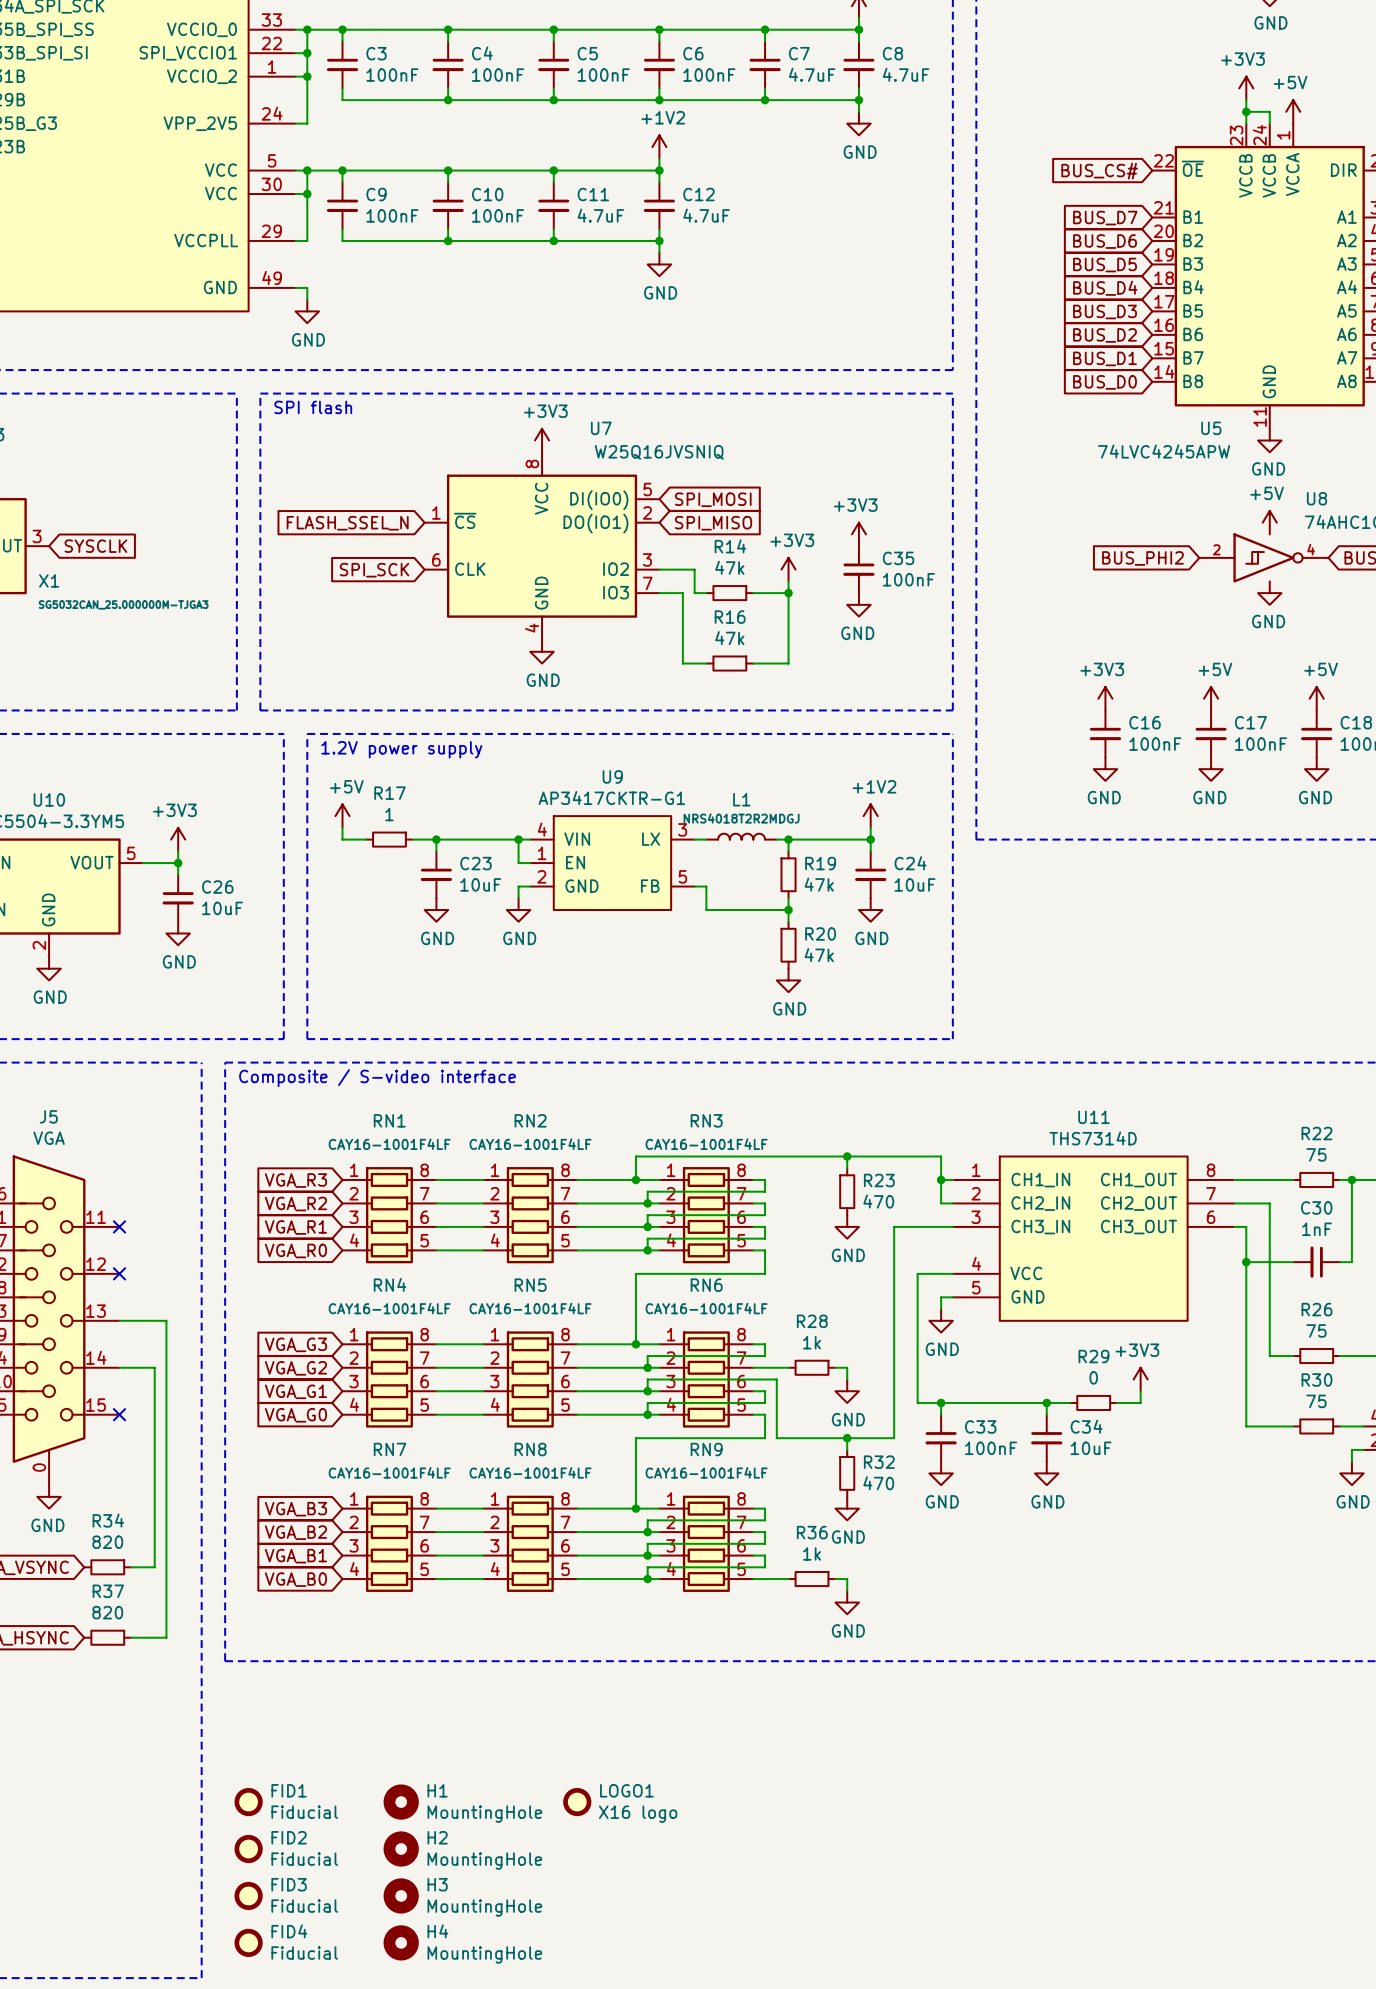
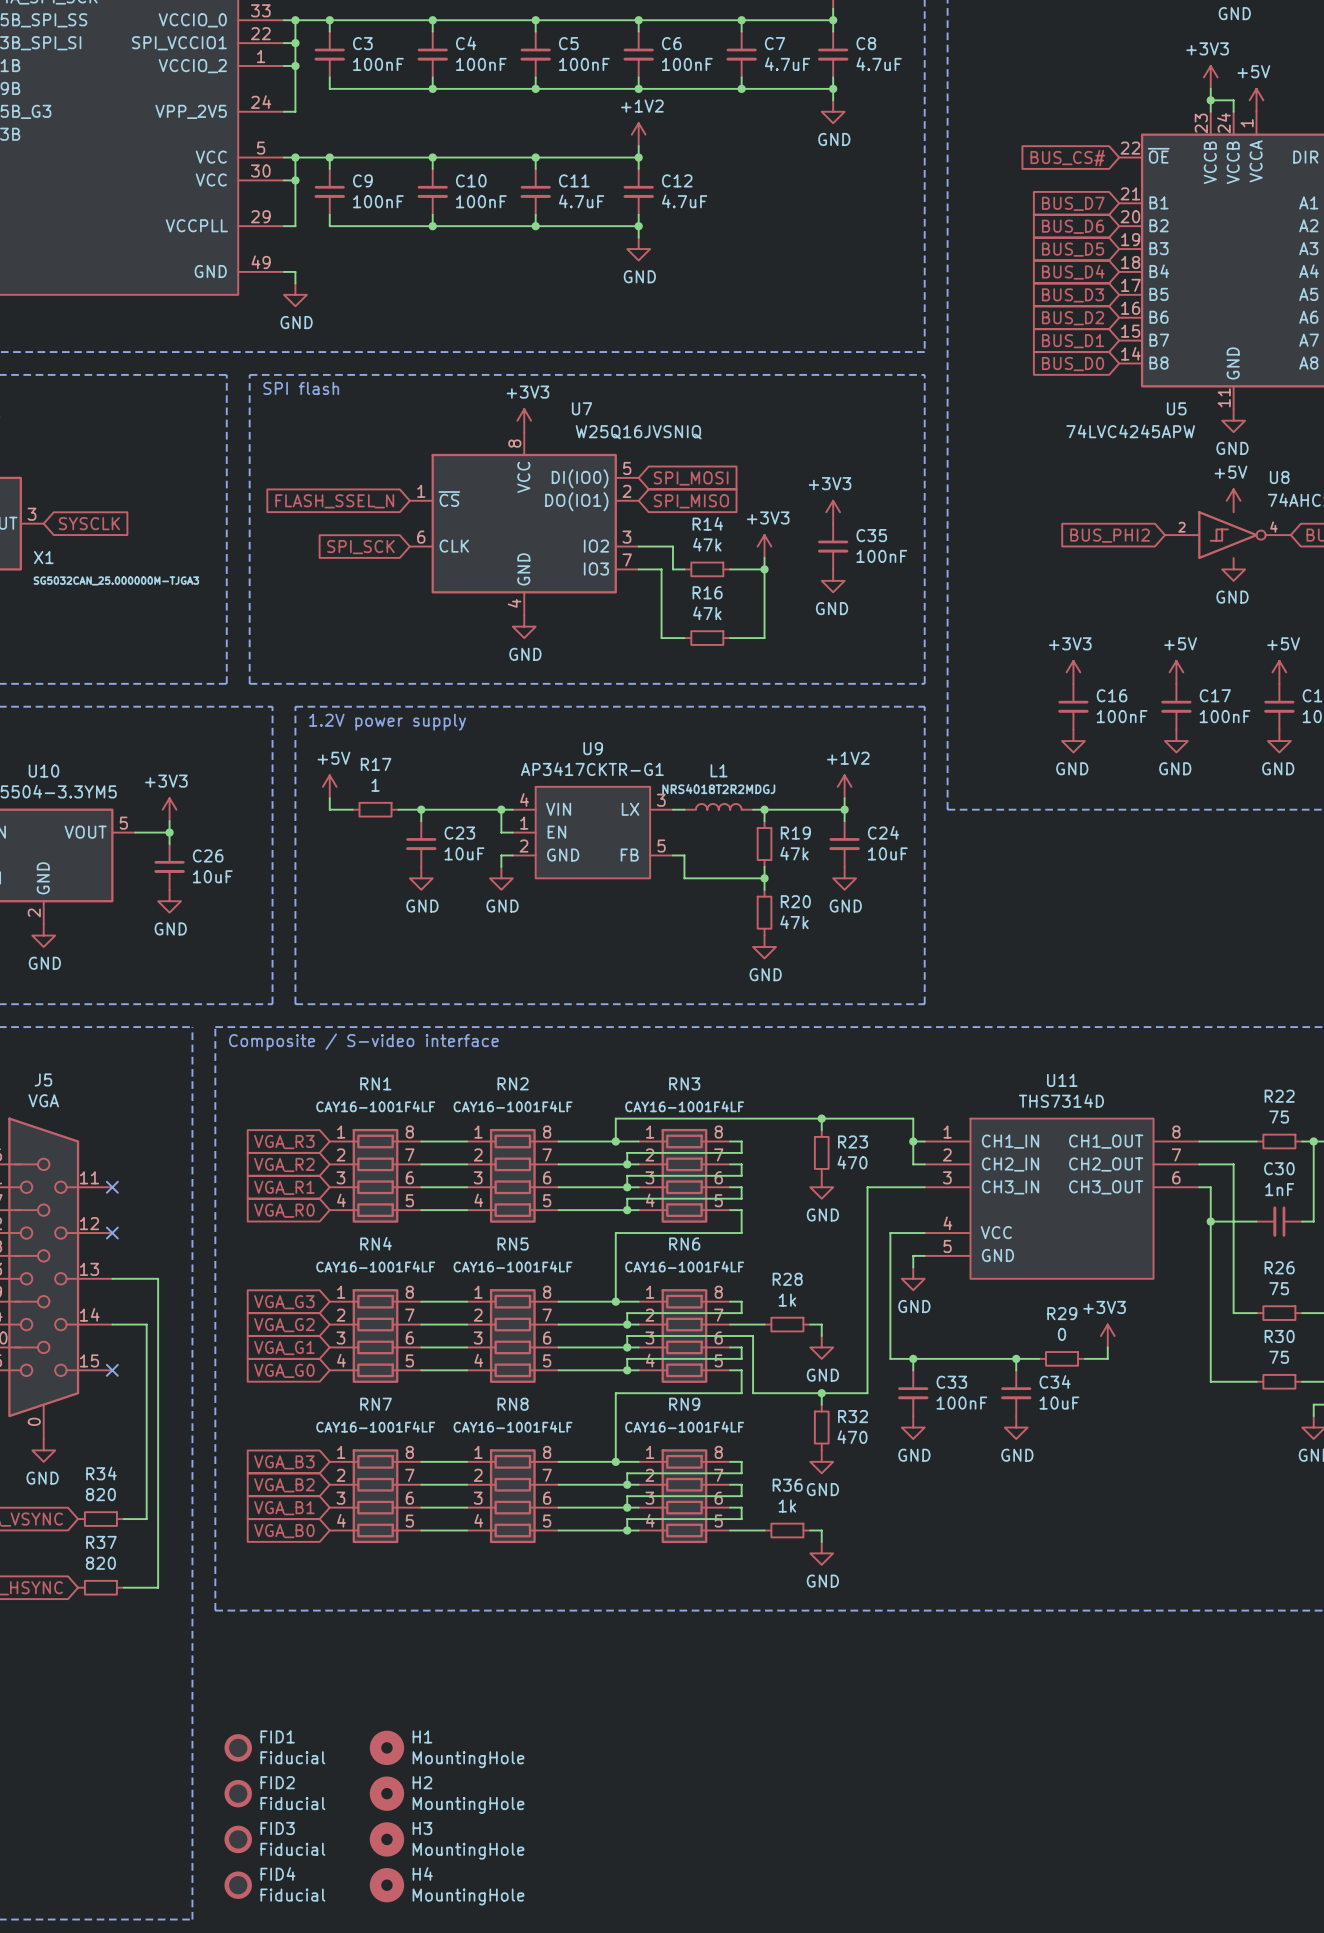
LOGO1: X16 logo (577, 1802) -> none

